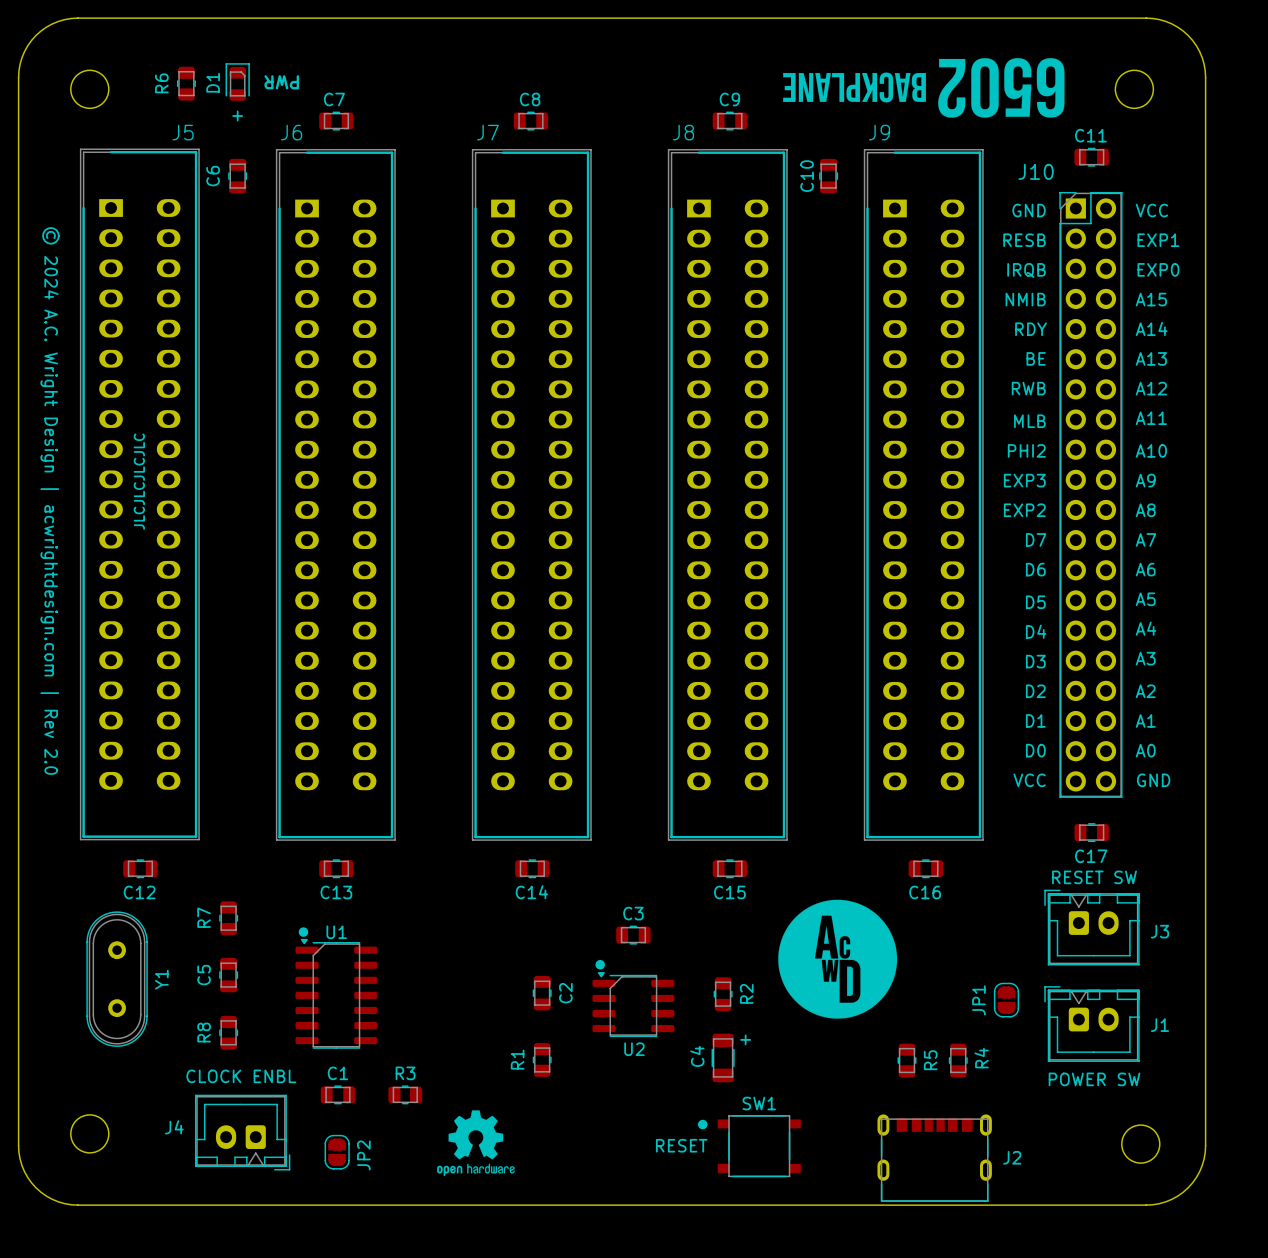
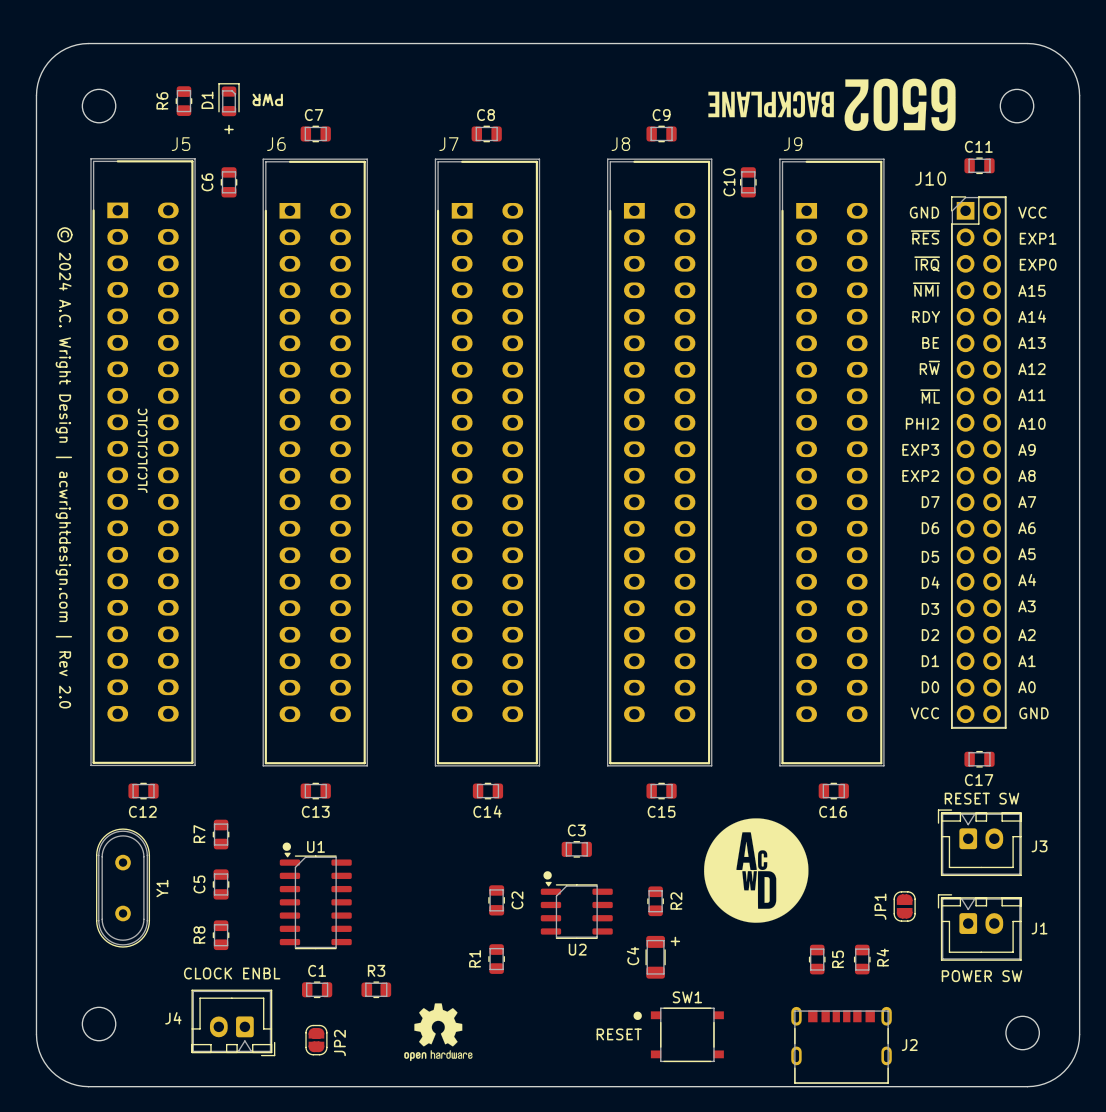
text: RESB (1024, 240) -> ~{RES} (925, 237)
text: IRQB (1026, 270) -> ~{IRQ} (927, 264)
text: NMIB (1025, 299) -> ~{NMI} (926, 289)
text: RWB (1028, 388) -> R~{W} (929, 367)
text: MLB (1029, 421) -> ~{ML} (930, 396)

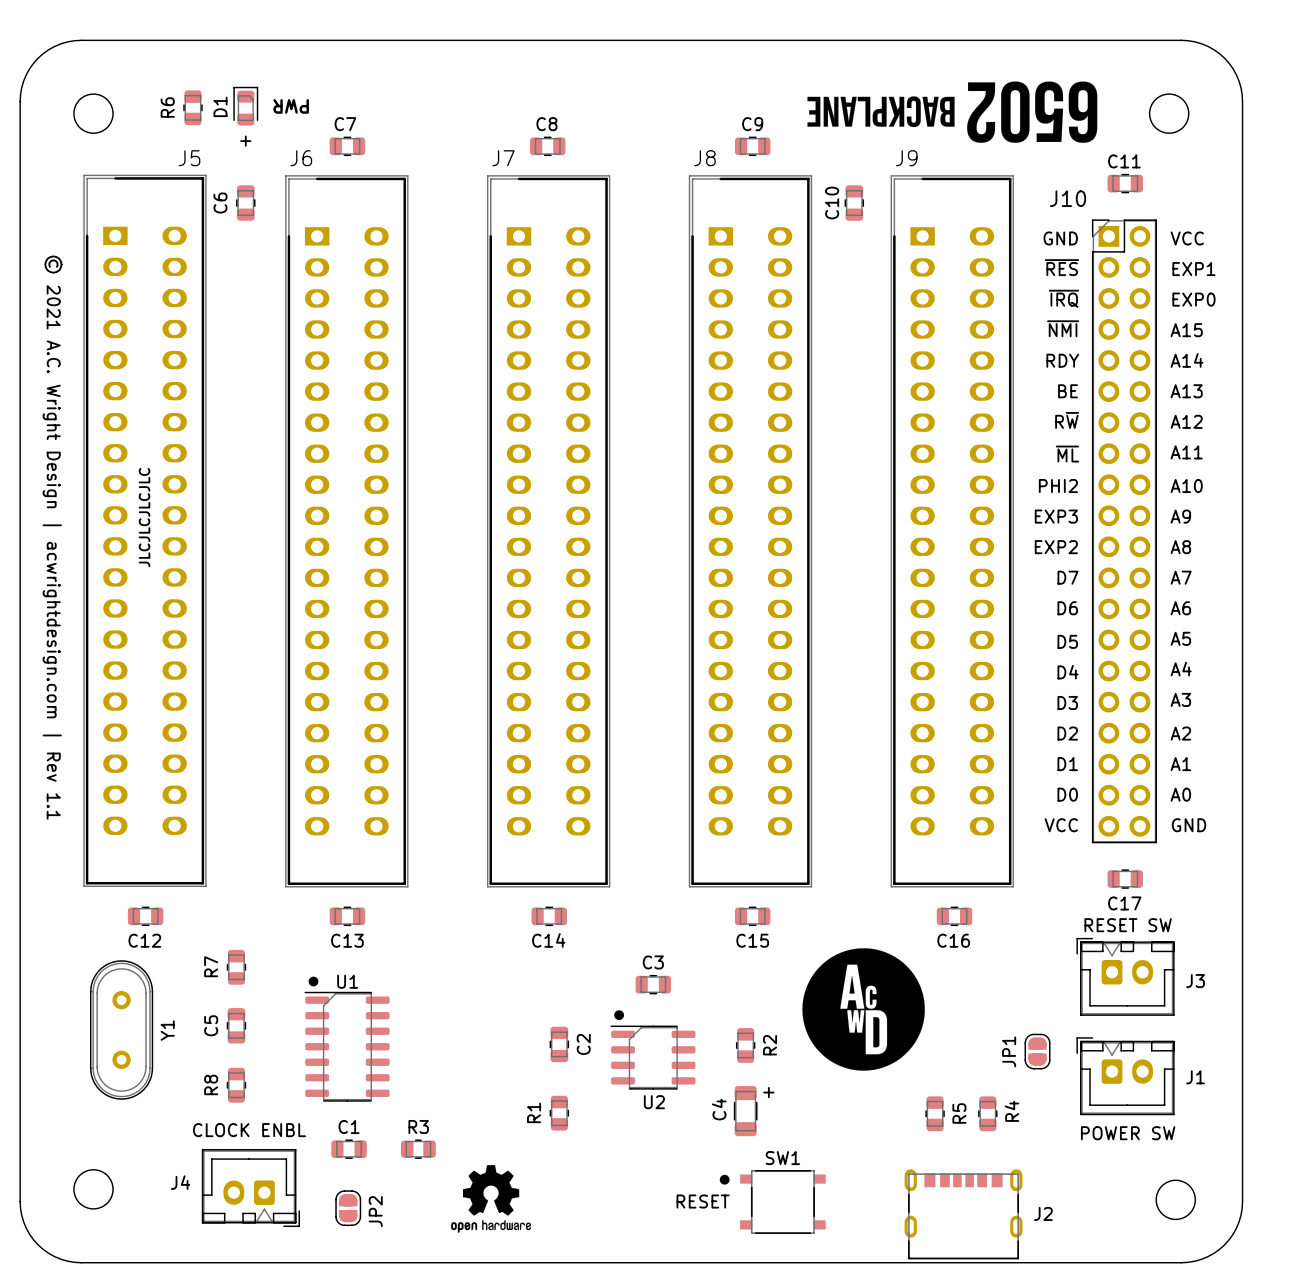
text: © 2024 A.C. Wright Design | acwrightdesign.com | Rev 2.0 (64, 467) -> © 2021 A.C. Wright Design | acwrightdesign.com | Rev 1.1 (52, 537)
U1 footprint: [279, 852, 352, 950] -> [304, 991, 390, 1102]
U2 footprint: [540, 881, 613, 939] -> [610, 1025, 696, 1090]

